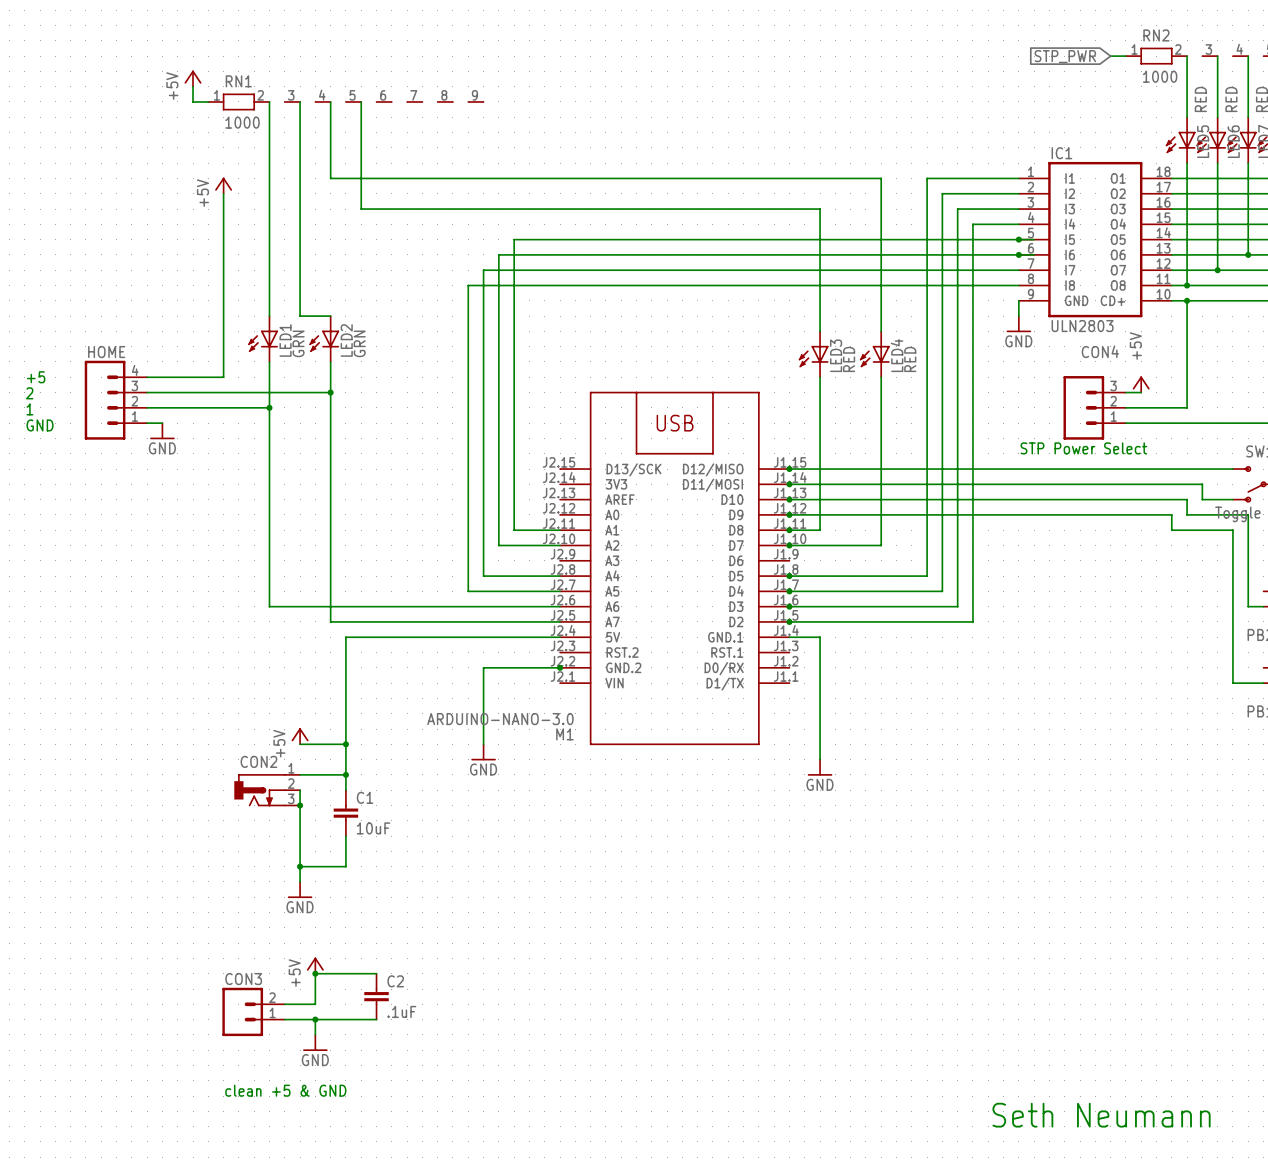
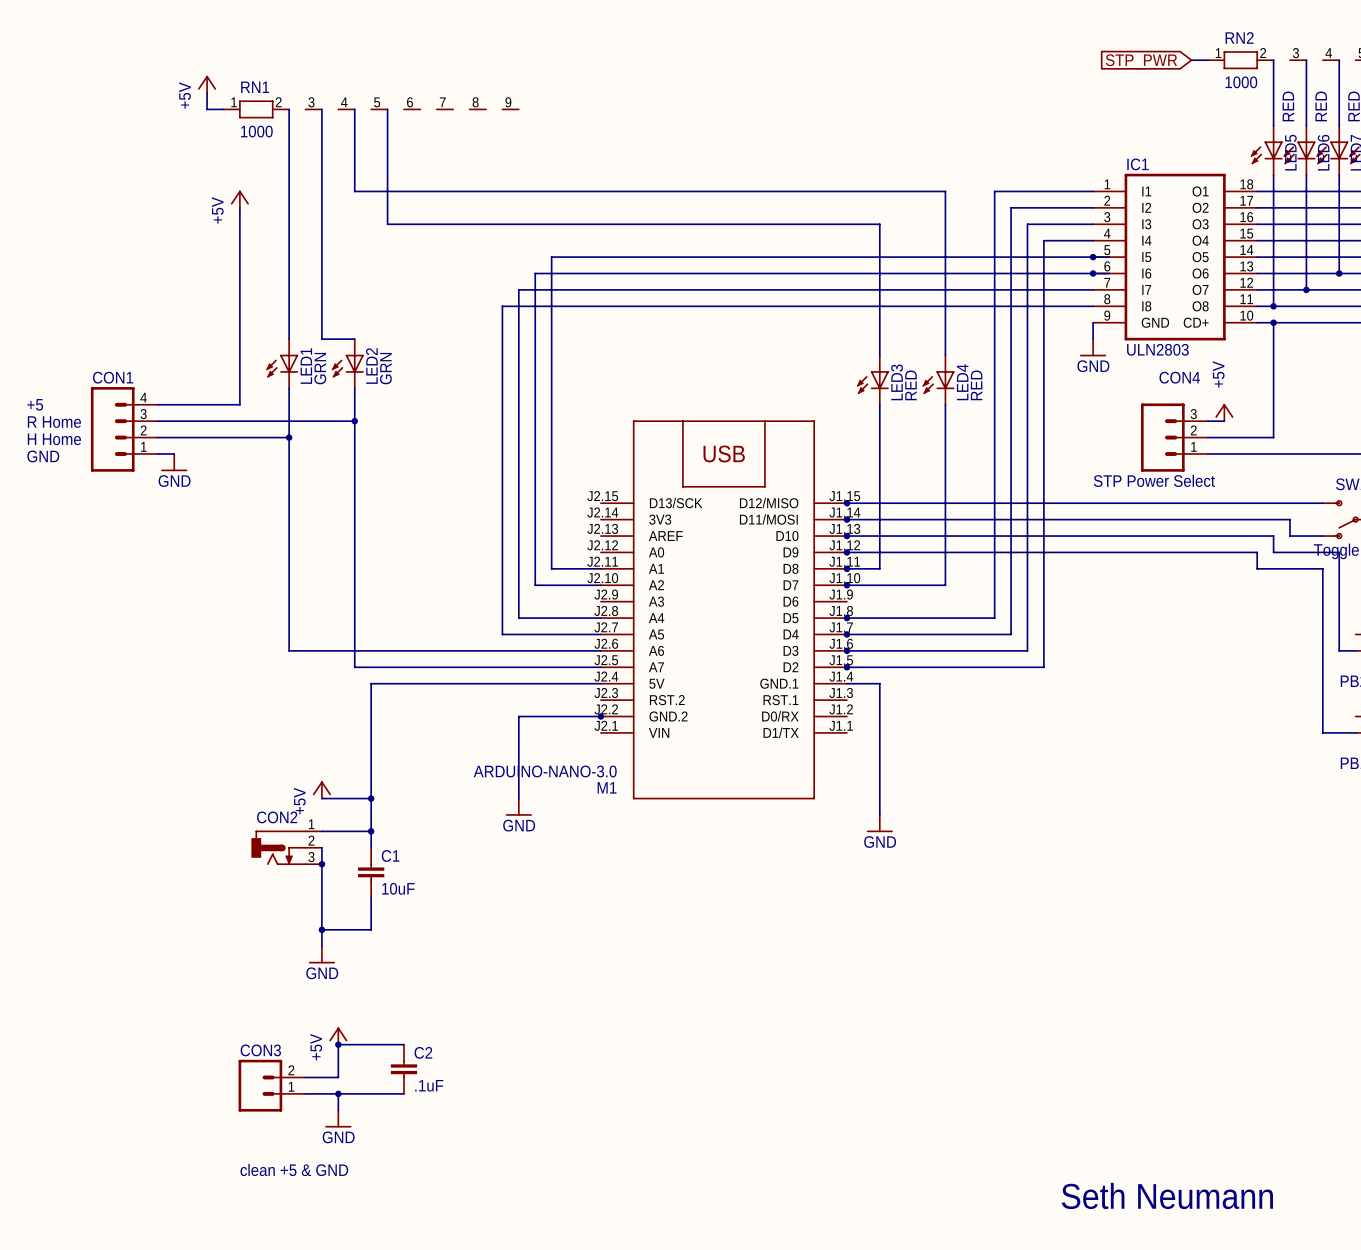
HOME name: HOME (106, 352) -> CON1 (113, 377)
text: 2 (29, 393) -> R Home (54, 422)
text: 1 (29, 409) -> H Home (54, 439)

